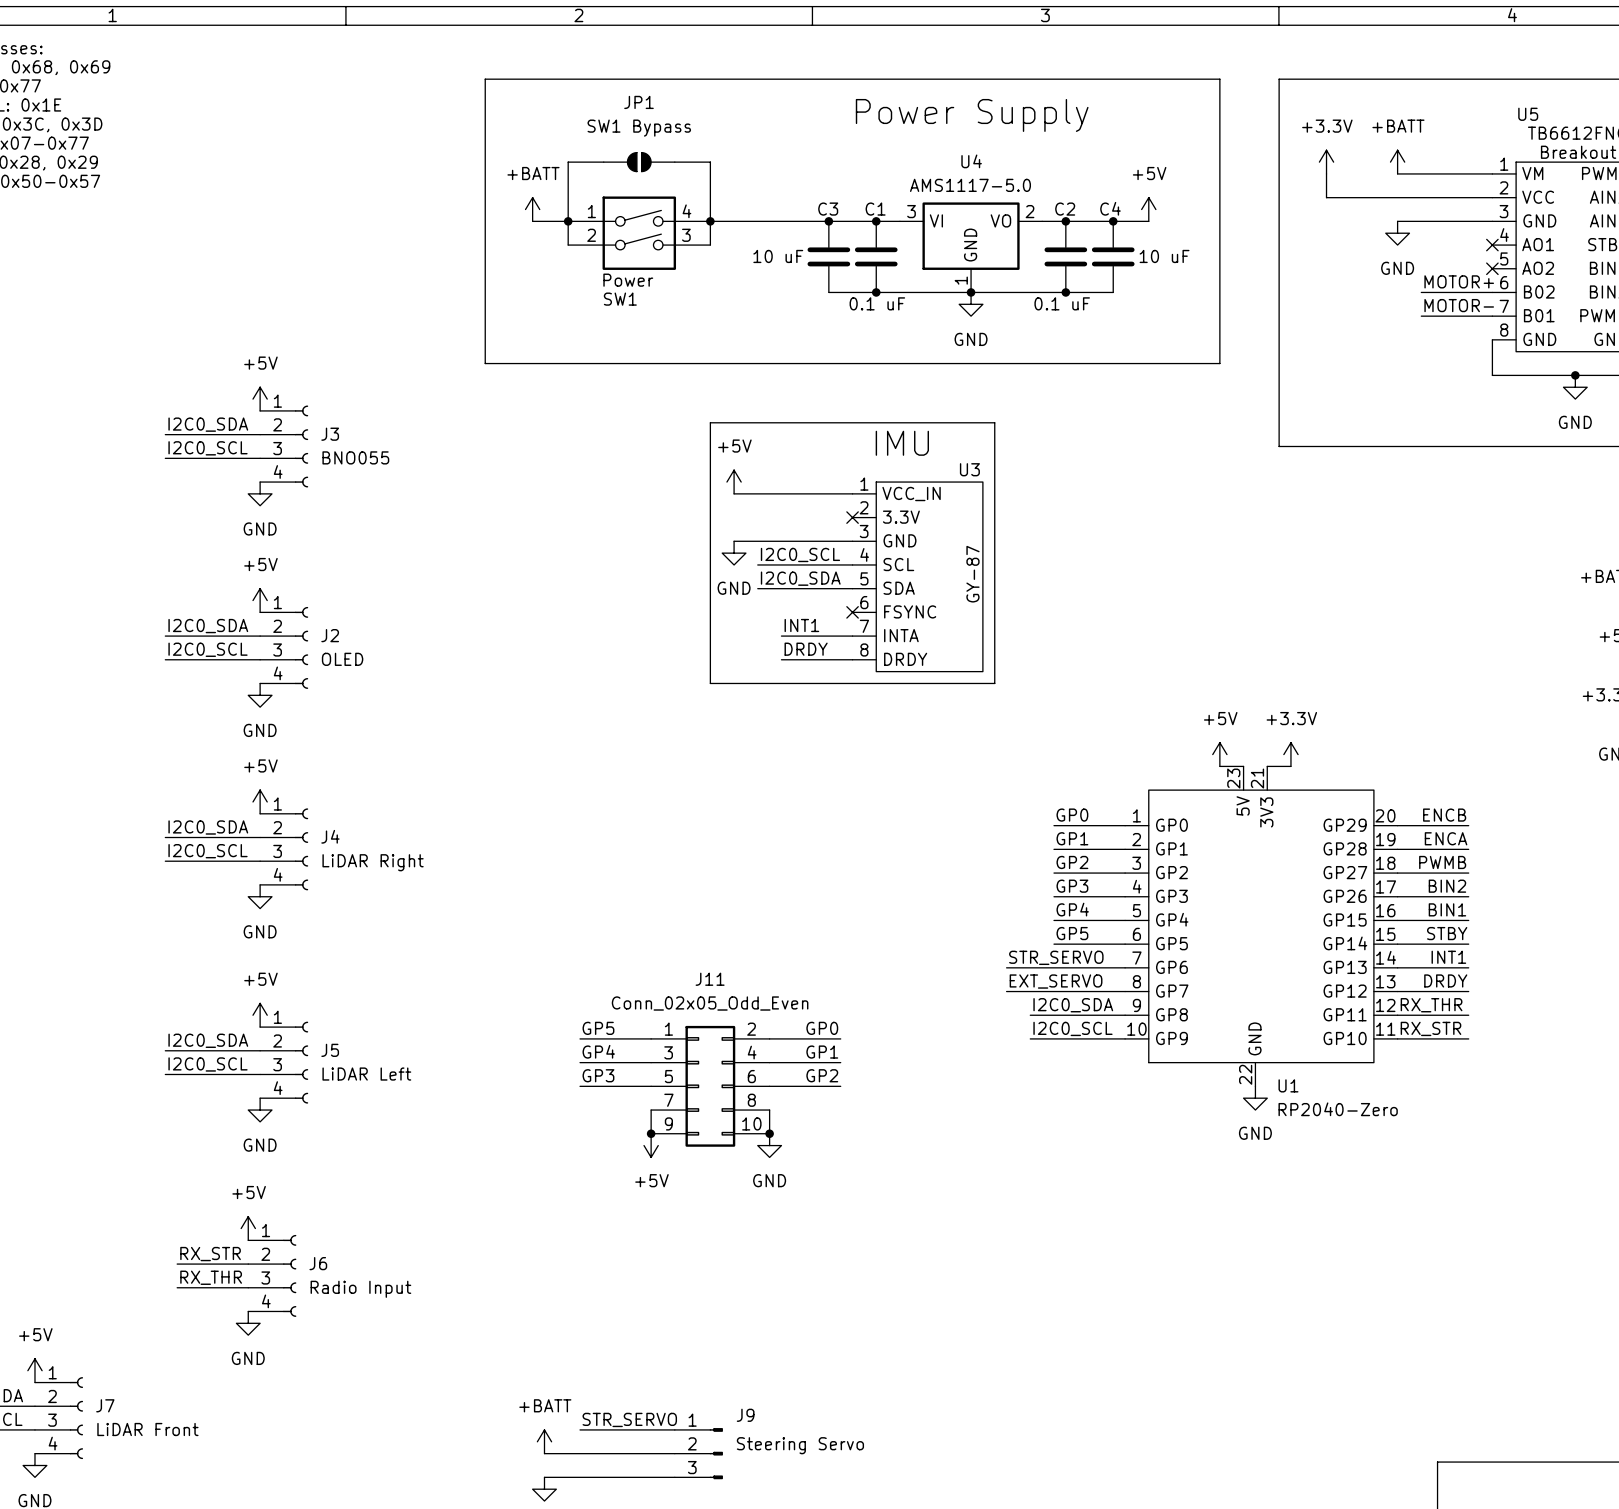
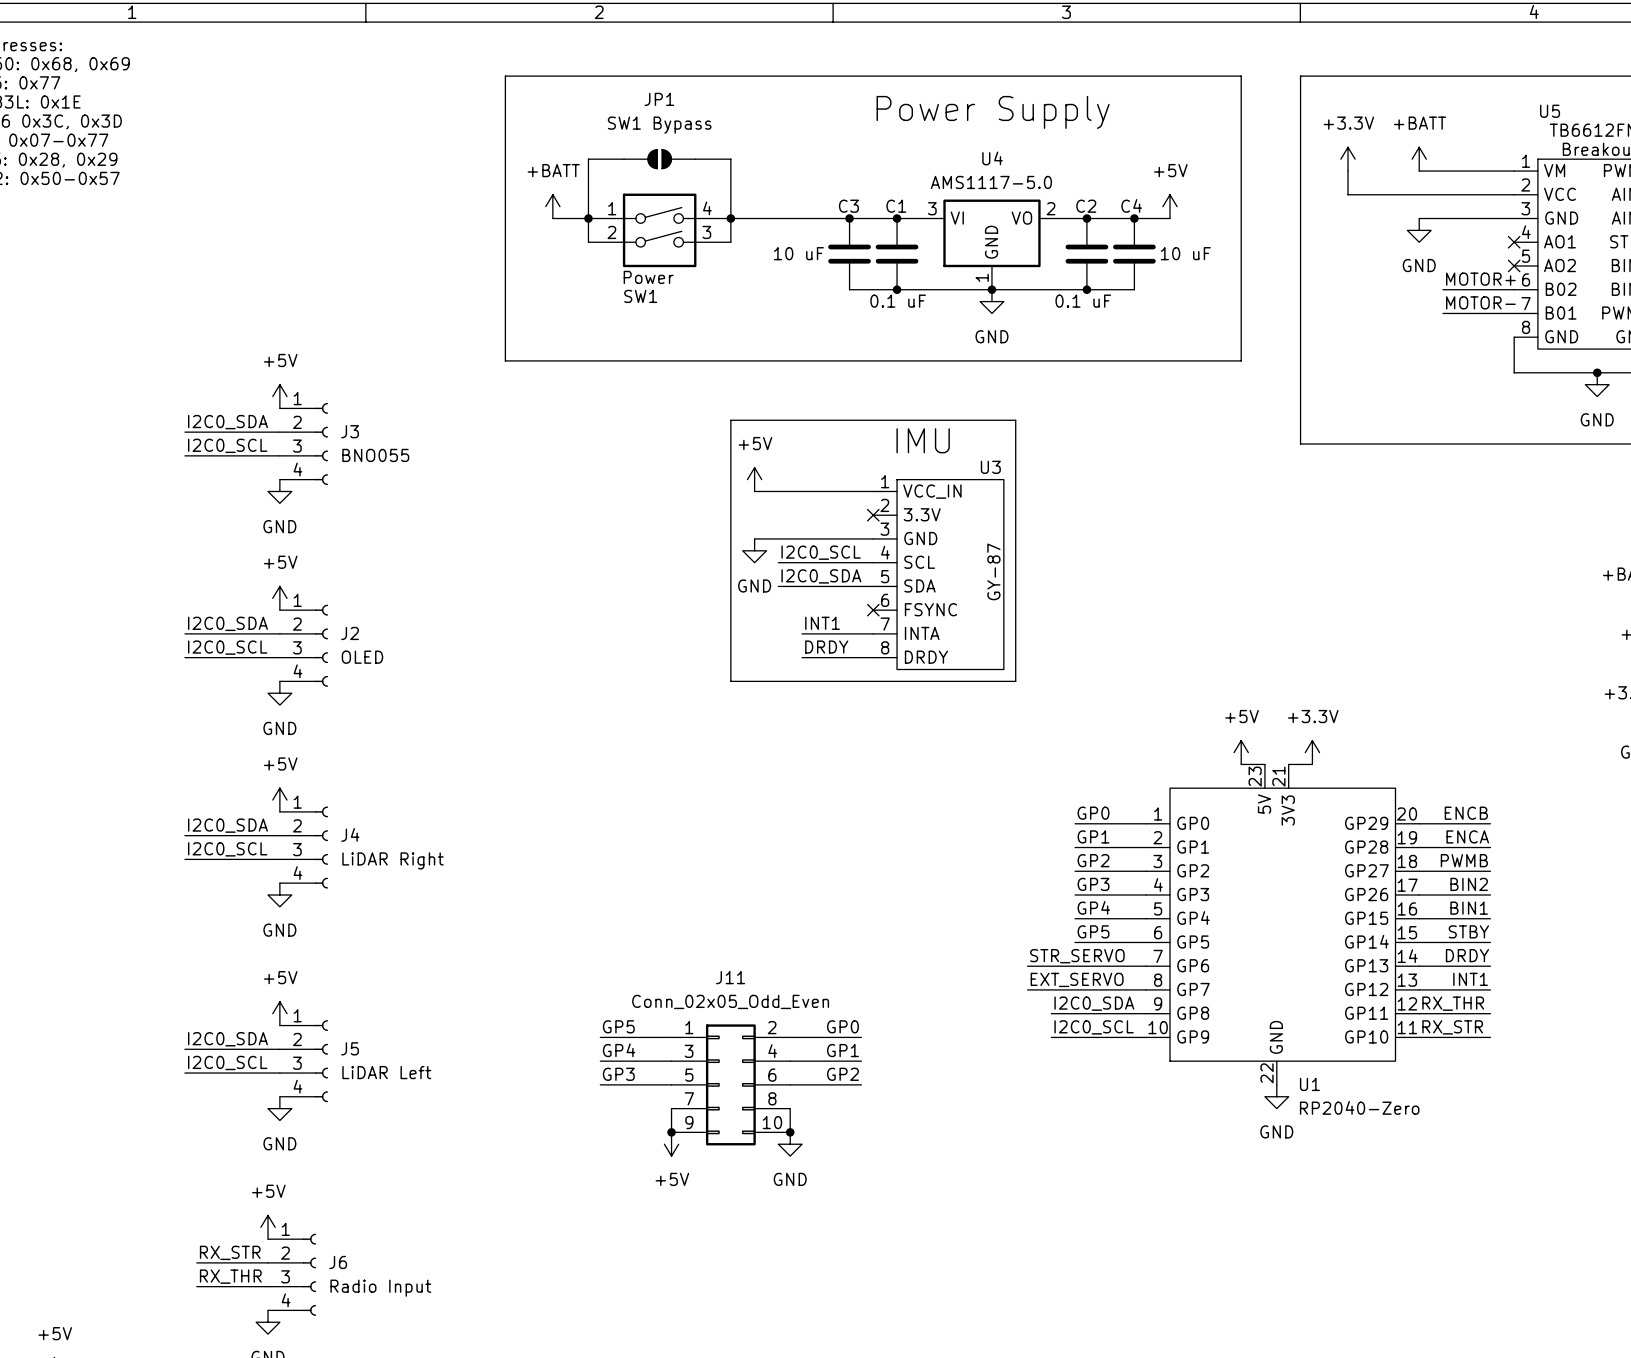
label: INT1 (1448, 957) -> DRDY (1467, 955)
label: DRDY (1445, 980) -> INT1 (1470, 979)

